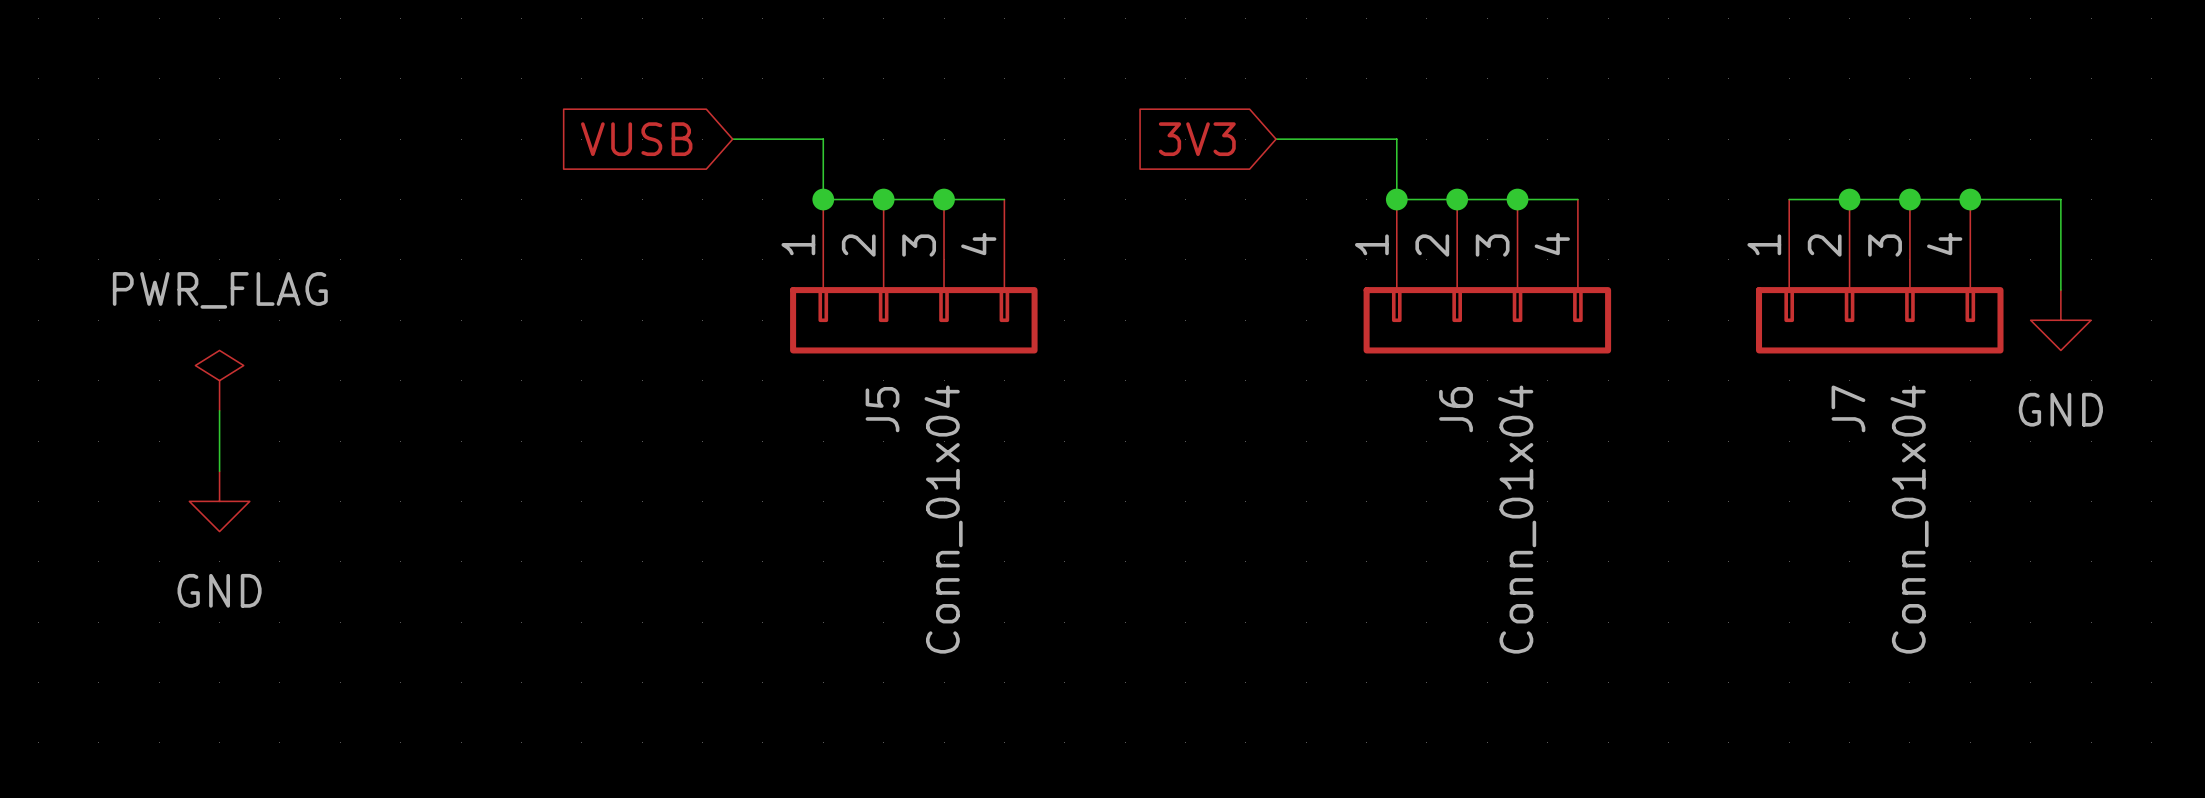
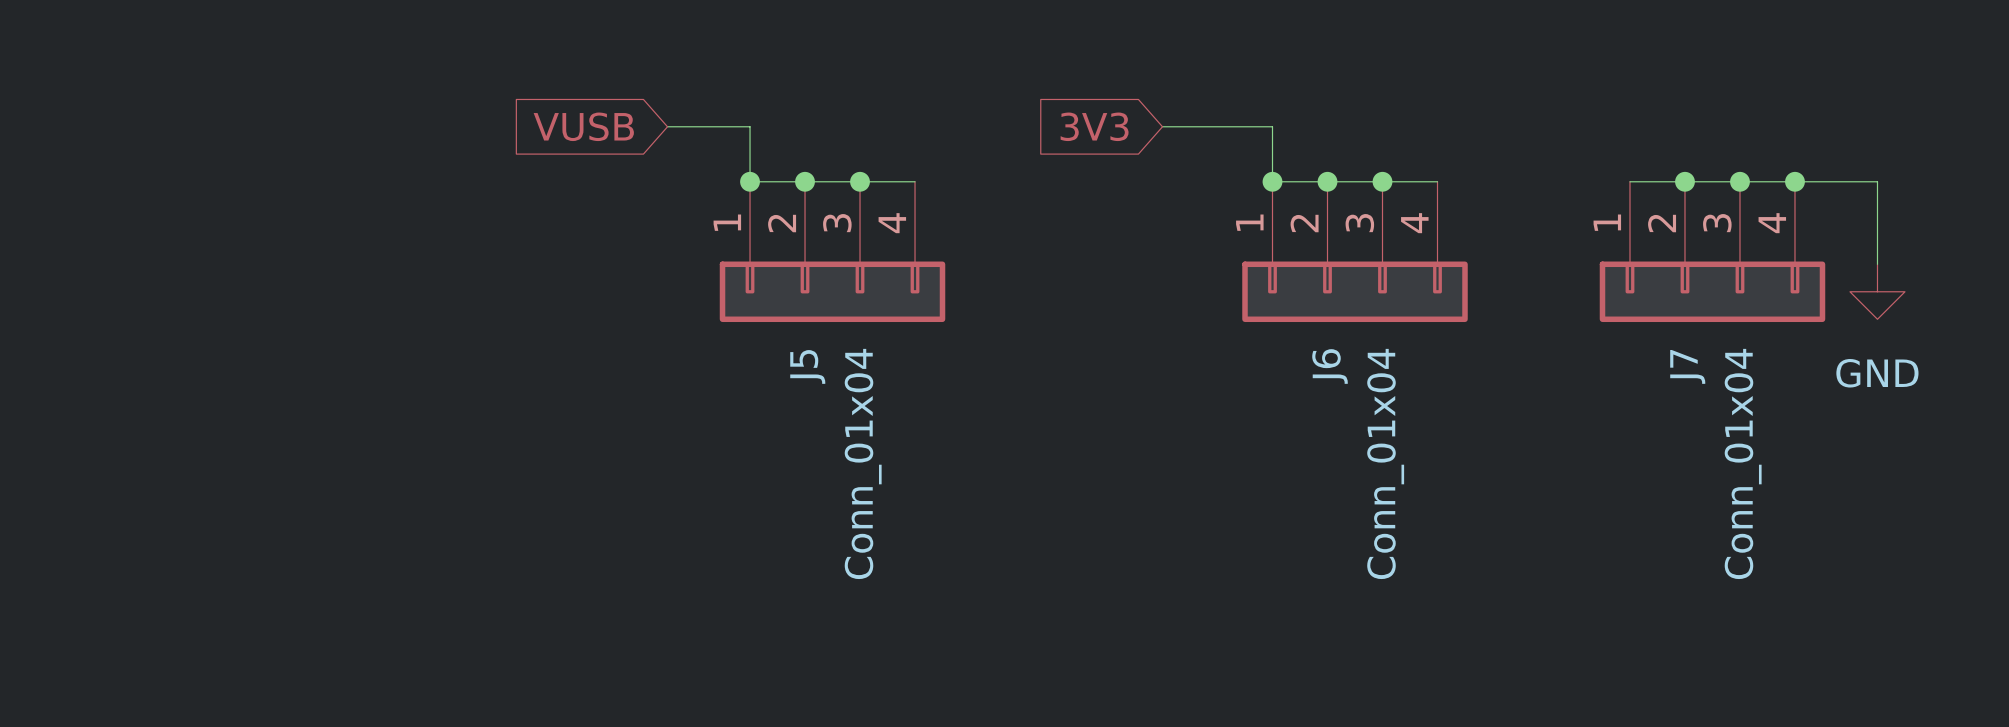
power symbol: PWR_FLAG (219, 380) -> none
wire: (219, 410) (219, 471) -> none
power symbol: GND (219, 501) -> none

